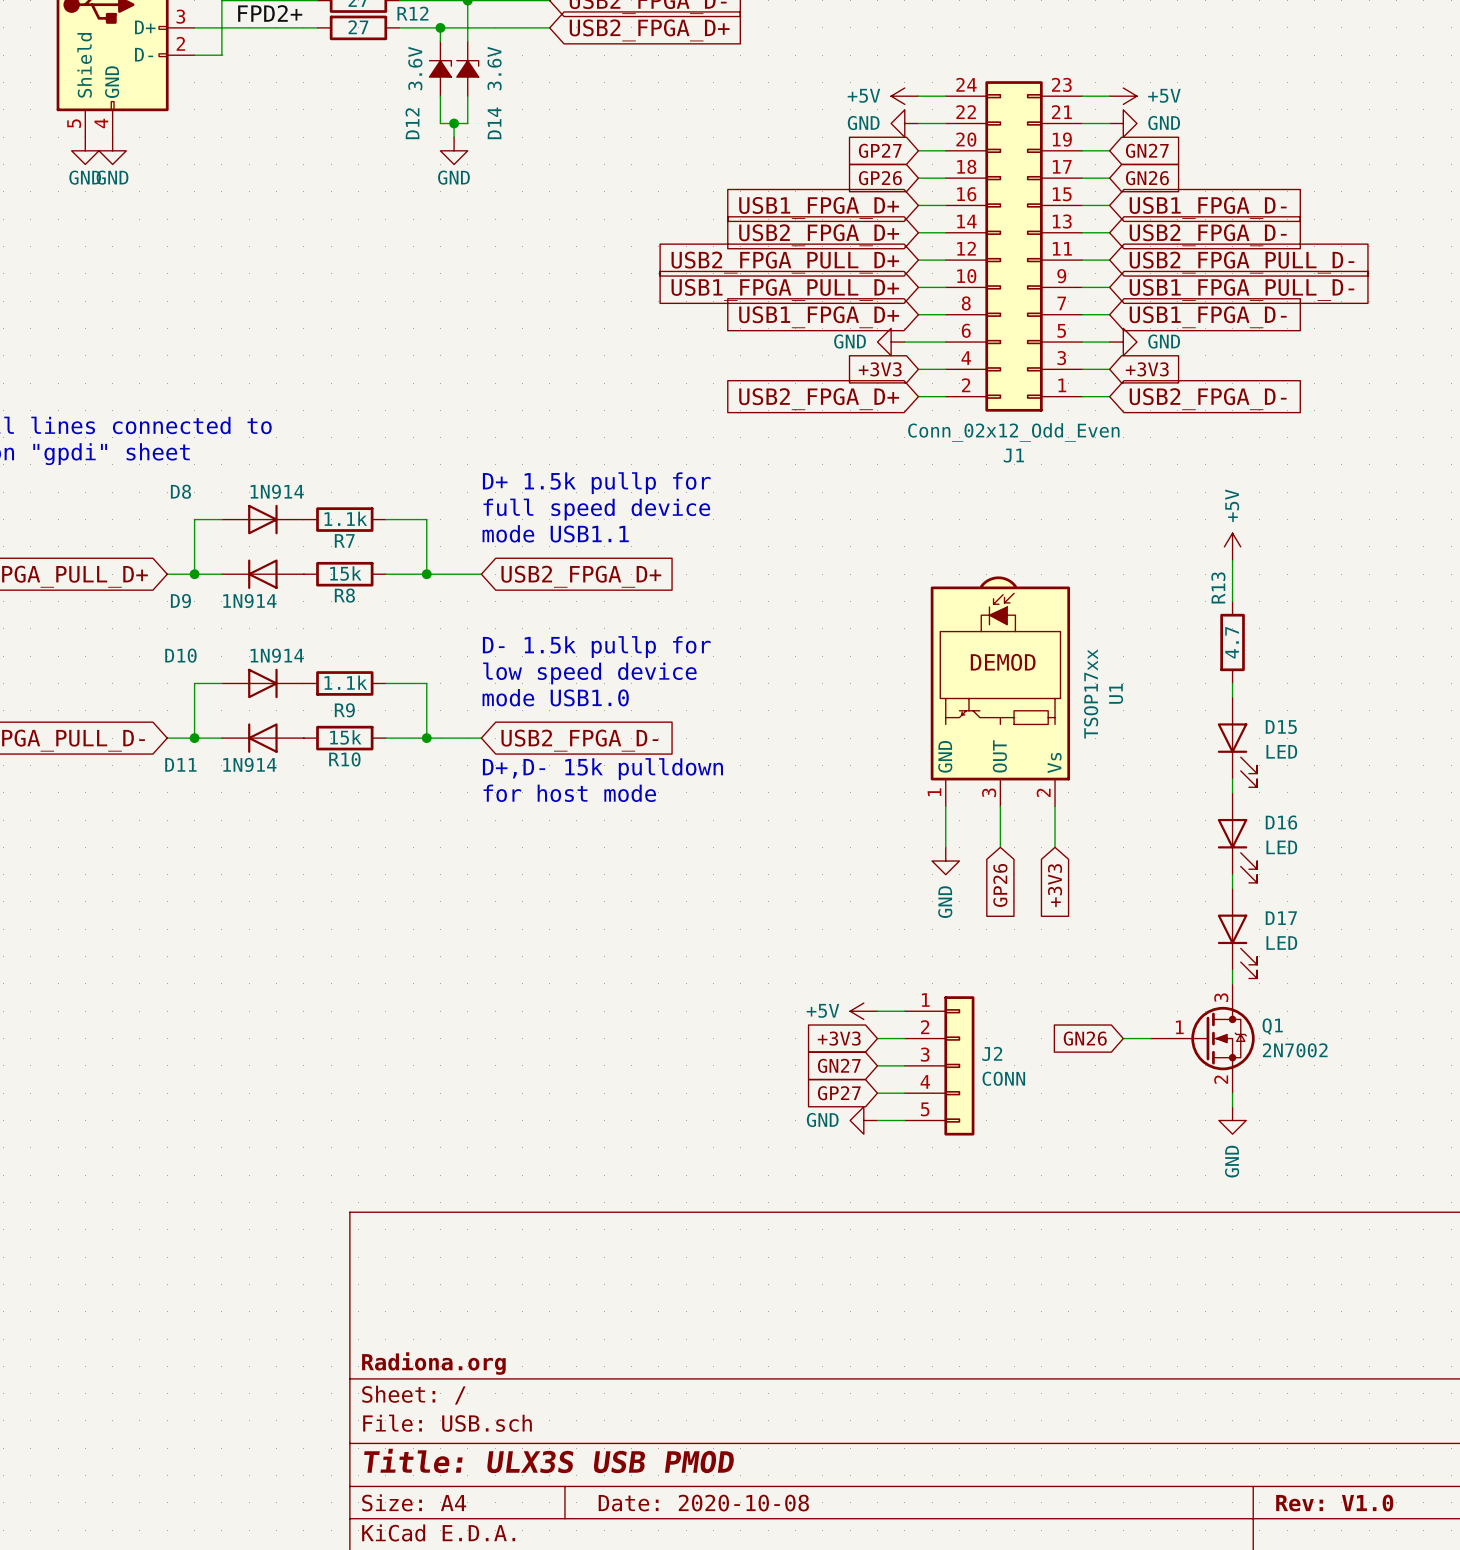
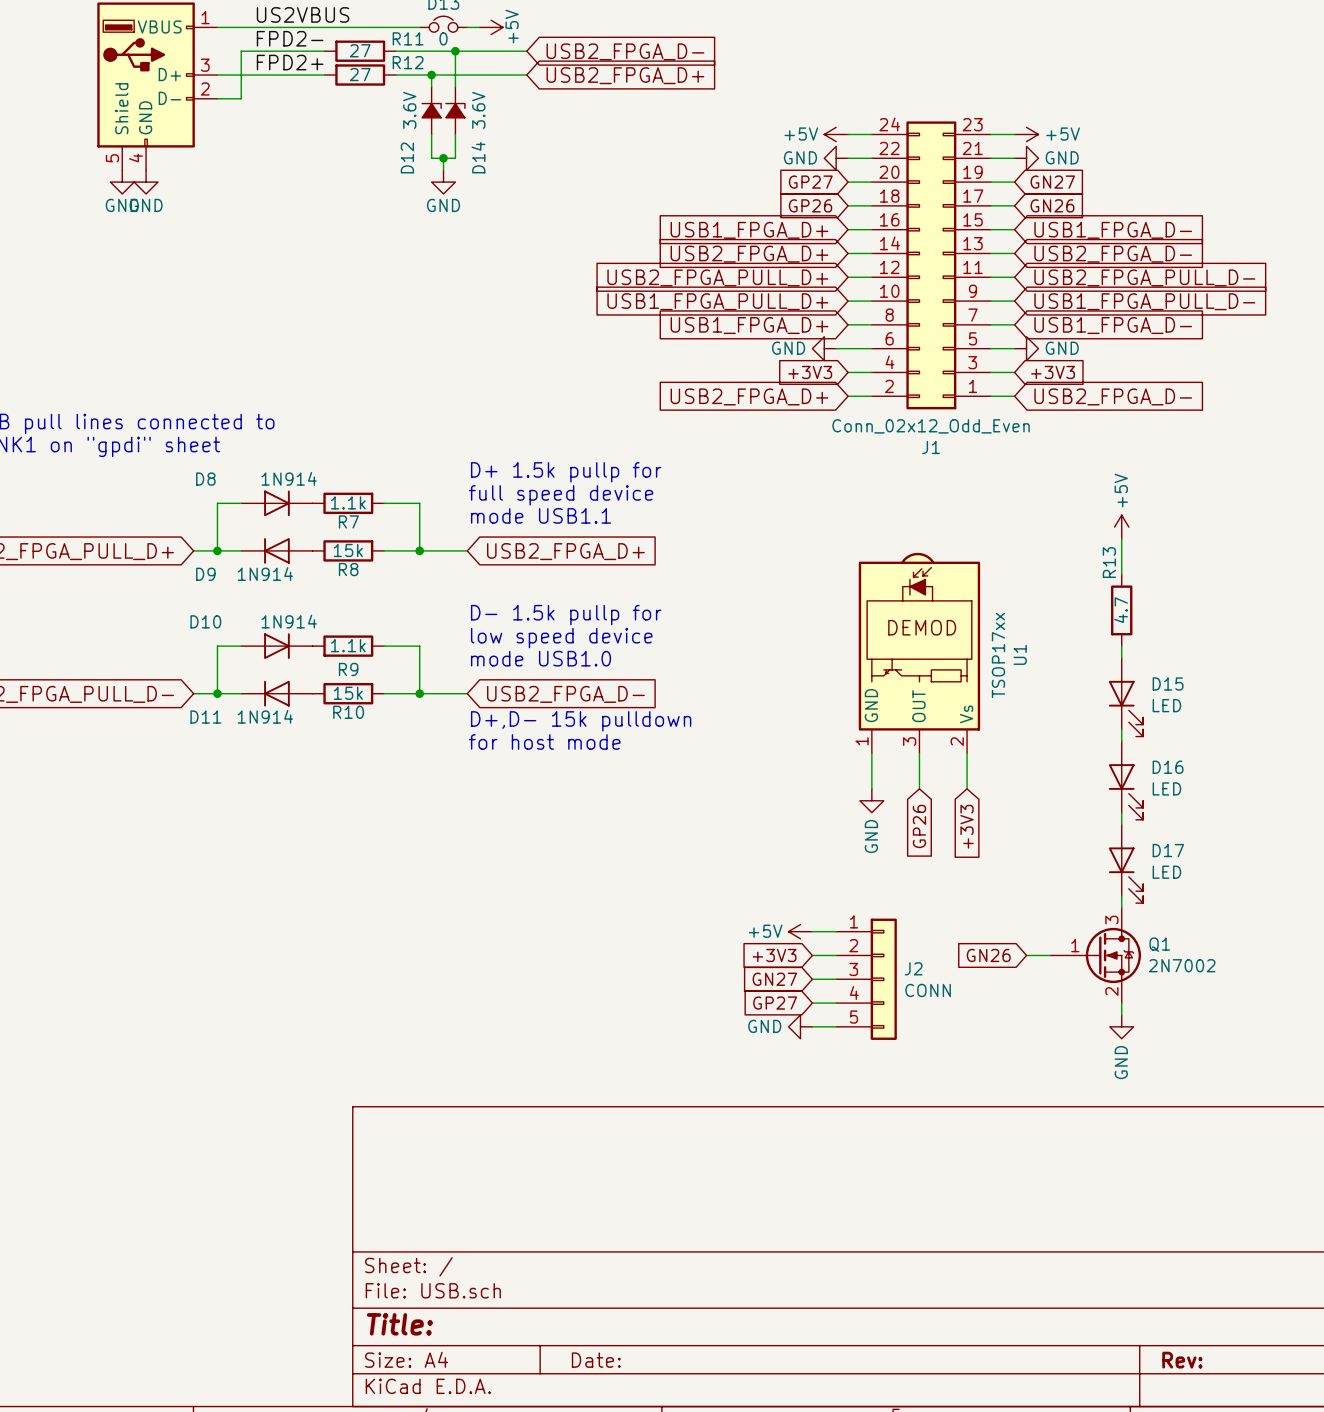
title block: Radiona.org (433, 1363) -> none
title block: Title: ULX3S USB PMOD (549, 1460) -> Title: (399, 1324)
title block: Date: 2020-10-08 (703, 1503) -> Date: (596, 1360)
title block: Rev: V1.0 (1334, 1503) -> Rev: (1182, 1360)

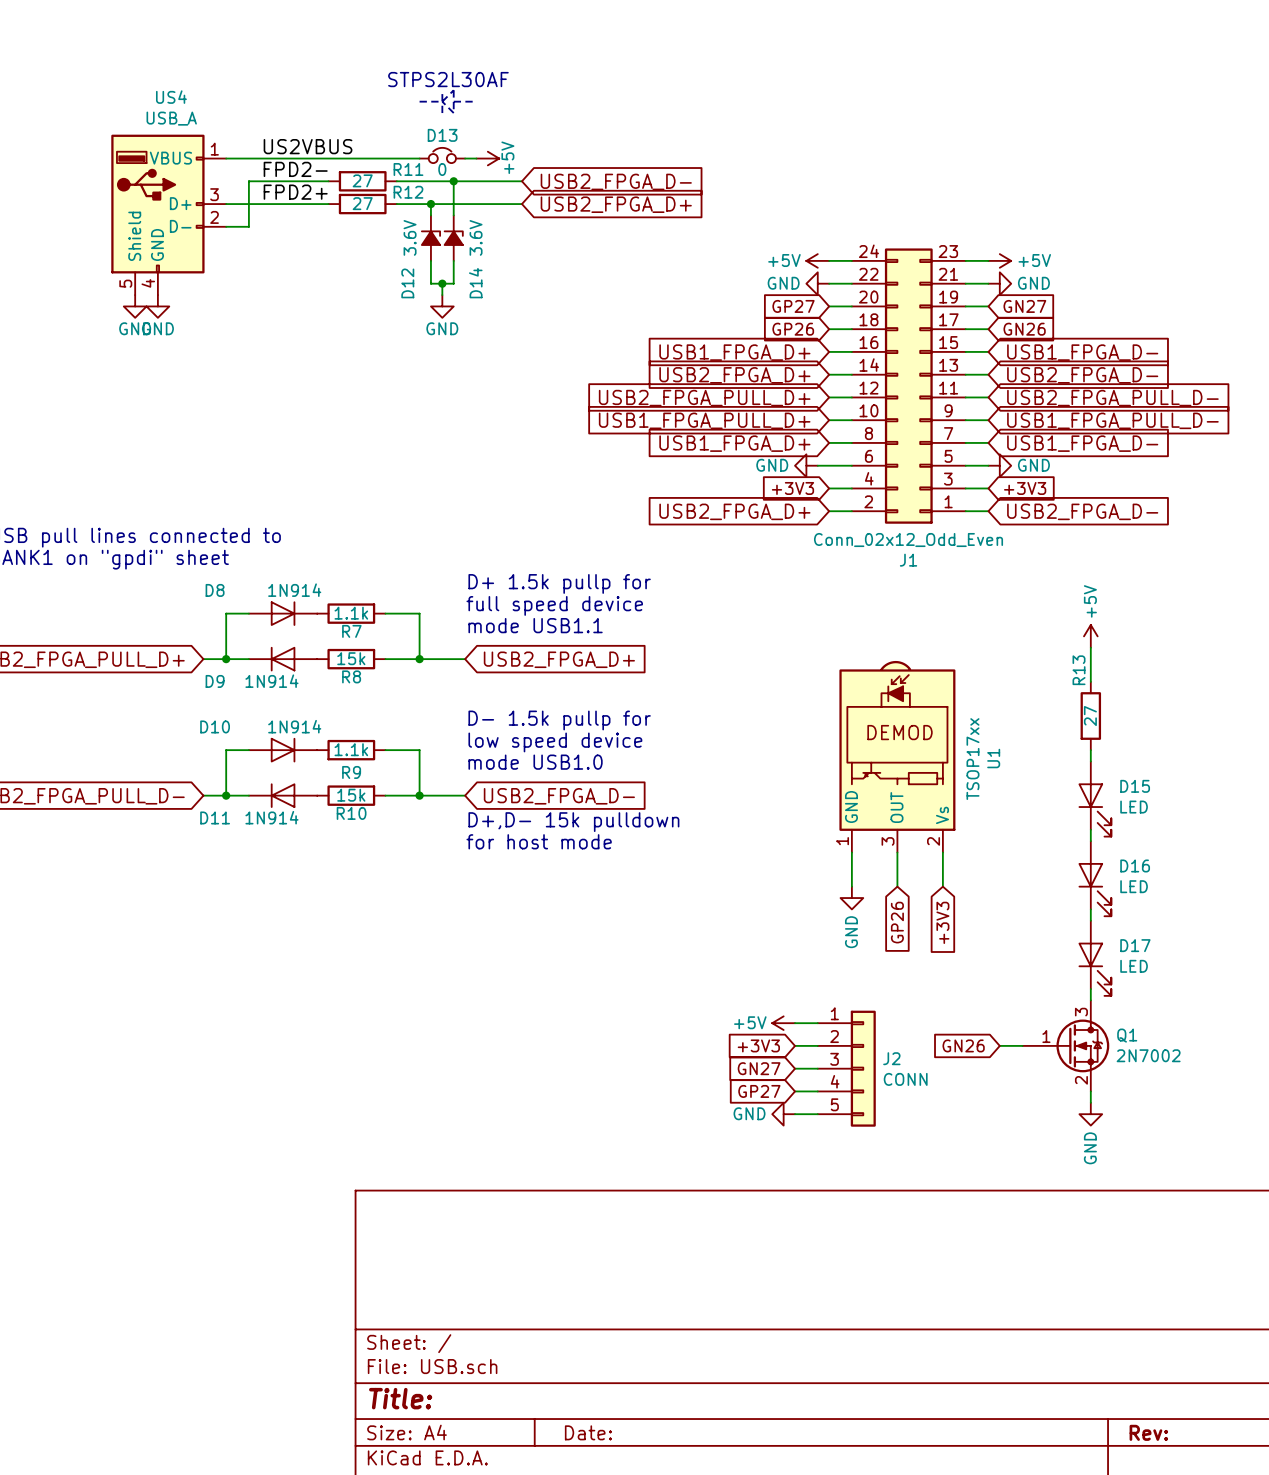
R13 value: 4.7 (1120, 610) -> 27 (1090, 716)

